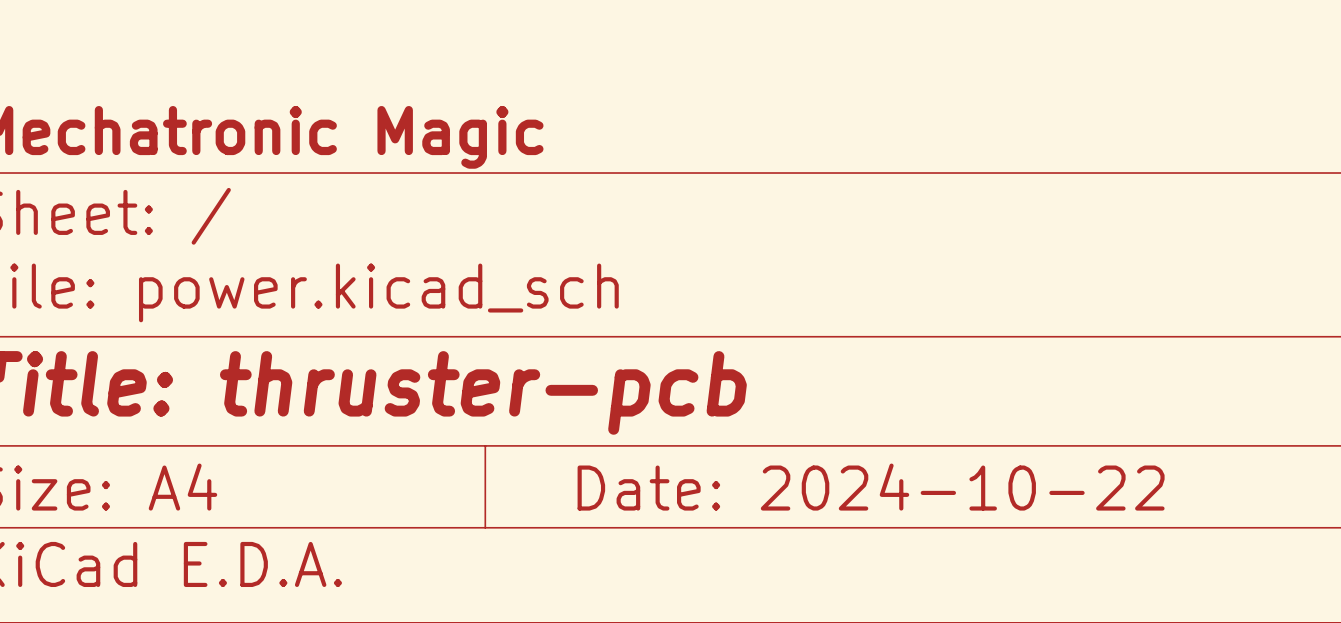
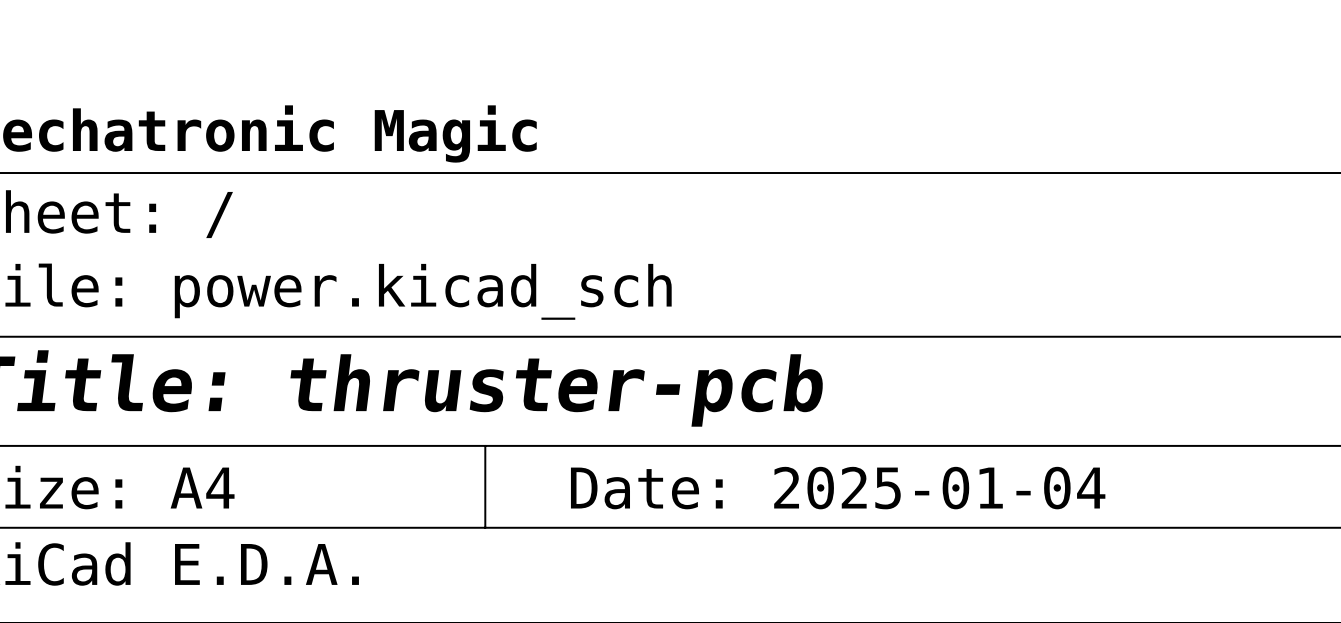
title block: Date: 2024-10-22 (871, 487) -> Date: 2025-01-04 (838, 488)

